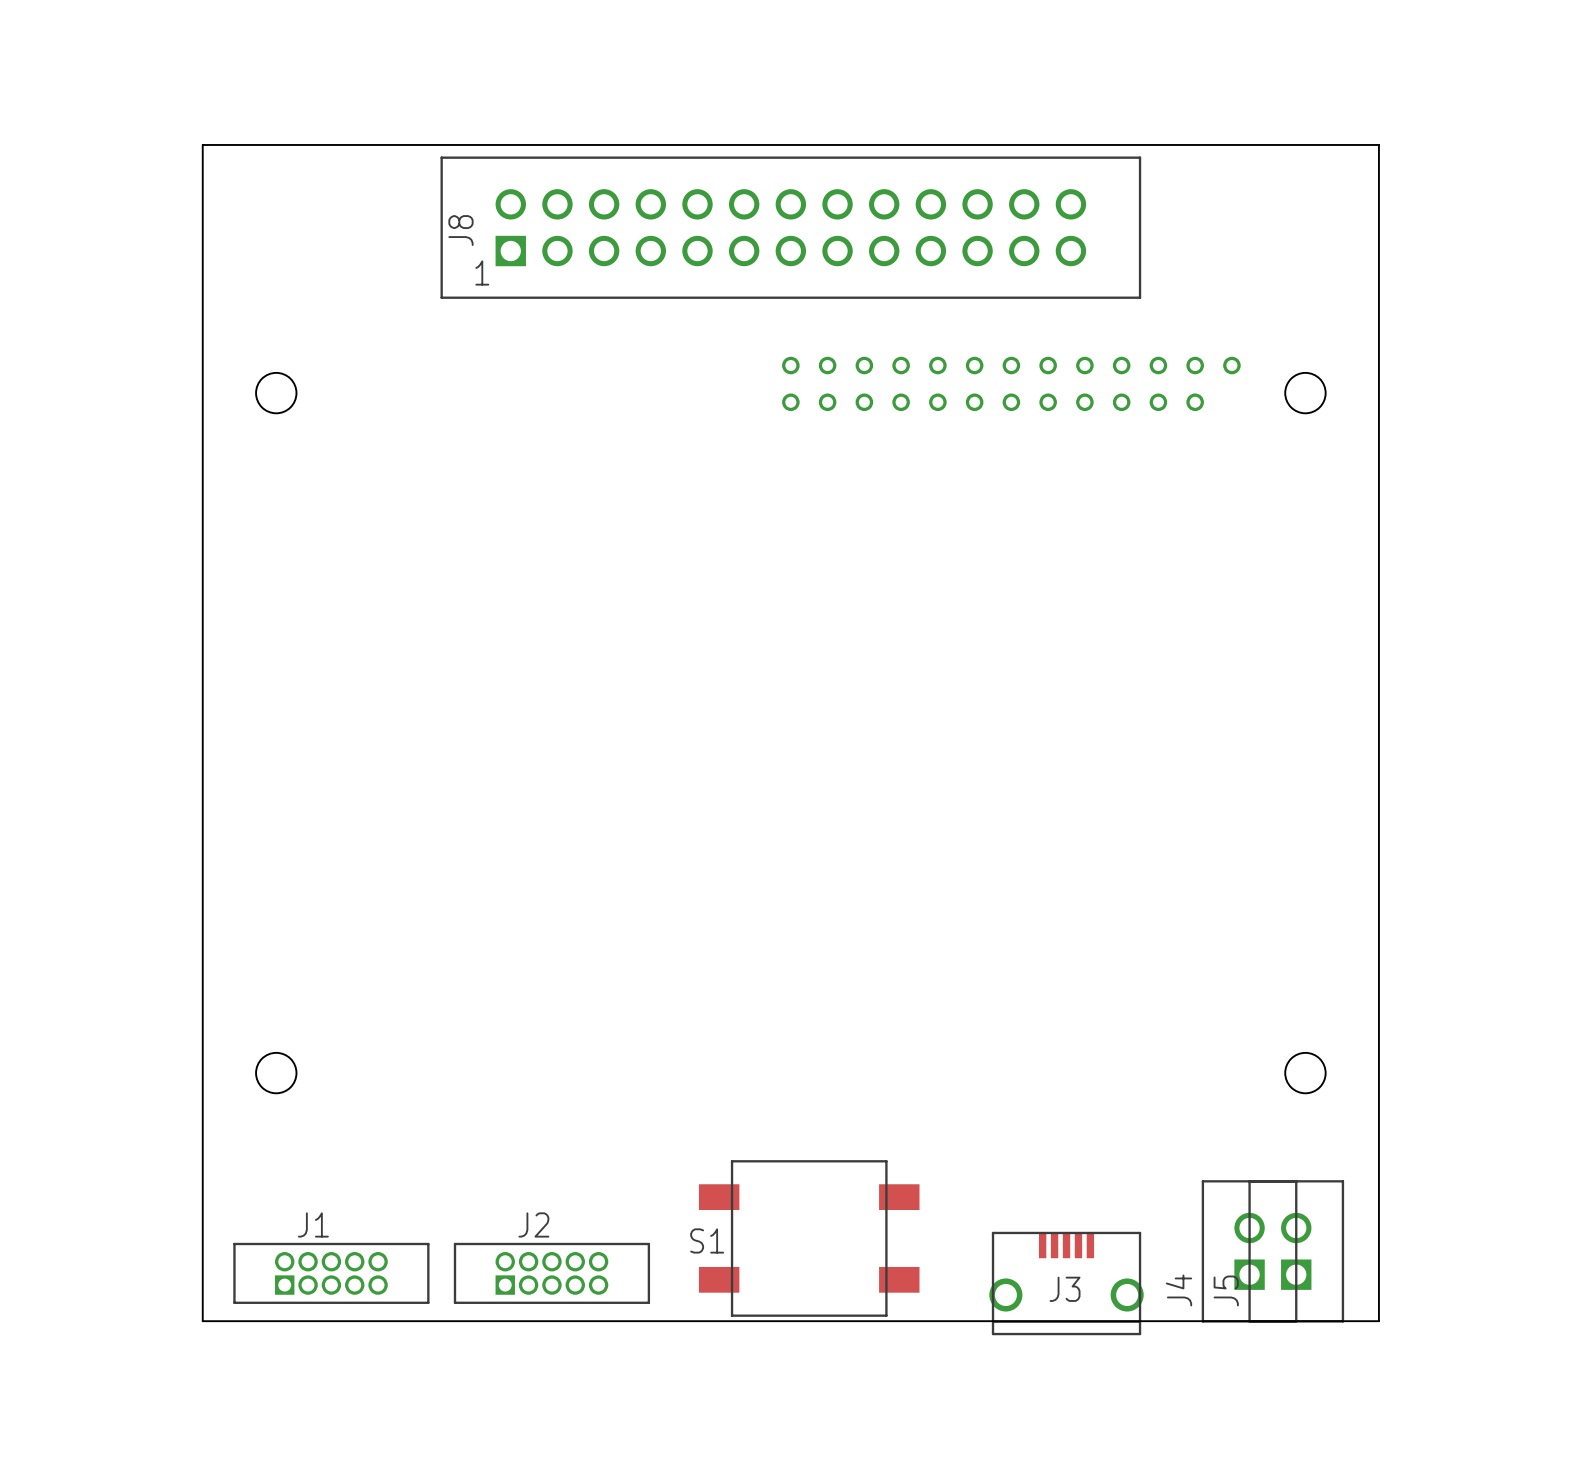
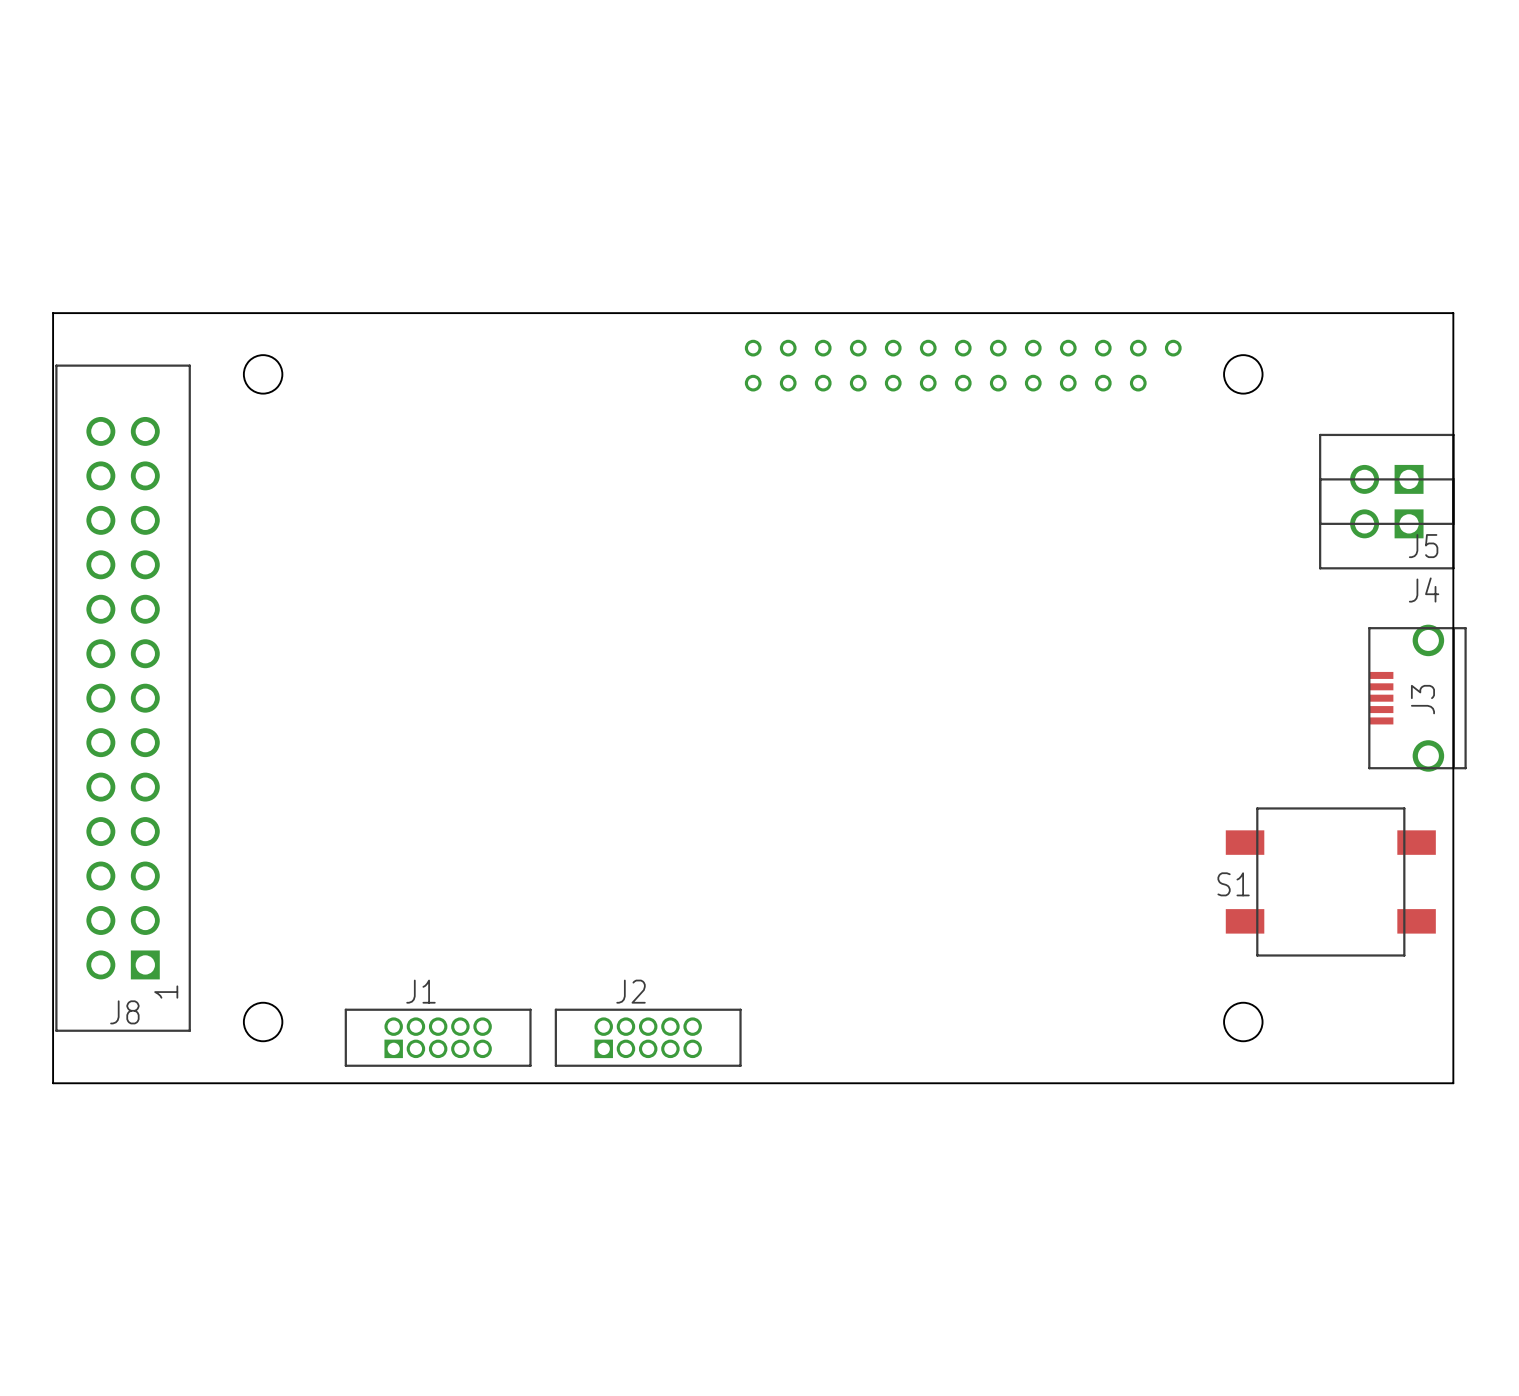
board edge: (202, 144) (202, 1321) (1378, 1321) (1378, 144) (202, 144) -> (53, 313) (53, 1083) (1453, 1083) (1453, 313) (53, 313)
J8 rotation: 0° (790, 227) -> 90° counterclockwise (123, 698)
J8 position: (790, 227) -> (123, 698)
S1 position: (809, 1238) -> (1330, 881)
J4 rotation: 0° (1249, 1251) -> 90° counterclockwise (1386, 523)
J4 position: (1249, 1251) -> (1386, 523)
J5 rotation: 0° (1296, 1251) -> 90° counterclockwise (1386, 479)
J5 position: (1296, 1251) -> (1386, 479)
J1 position: (331, 1273) -> (438, 1037)
J2 position: (551, 1273) -> (648, 1037)
J3 rotation: 0° (1066, 1283) -> 90° counterclockwise (1417, 698)
J3 position: (1066, 1283) -> (1417, 698)

